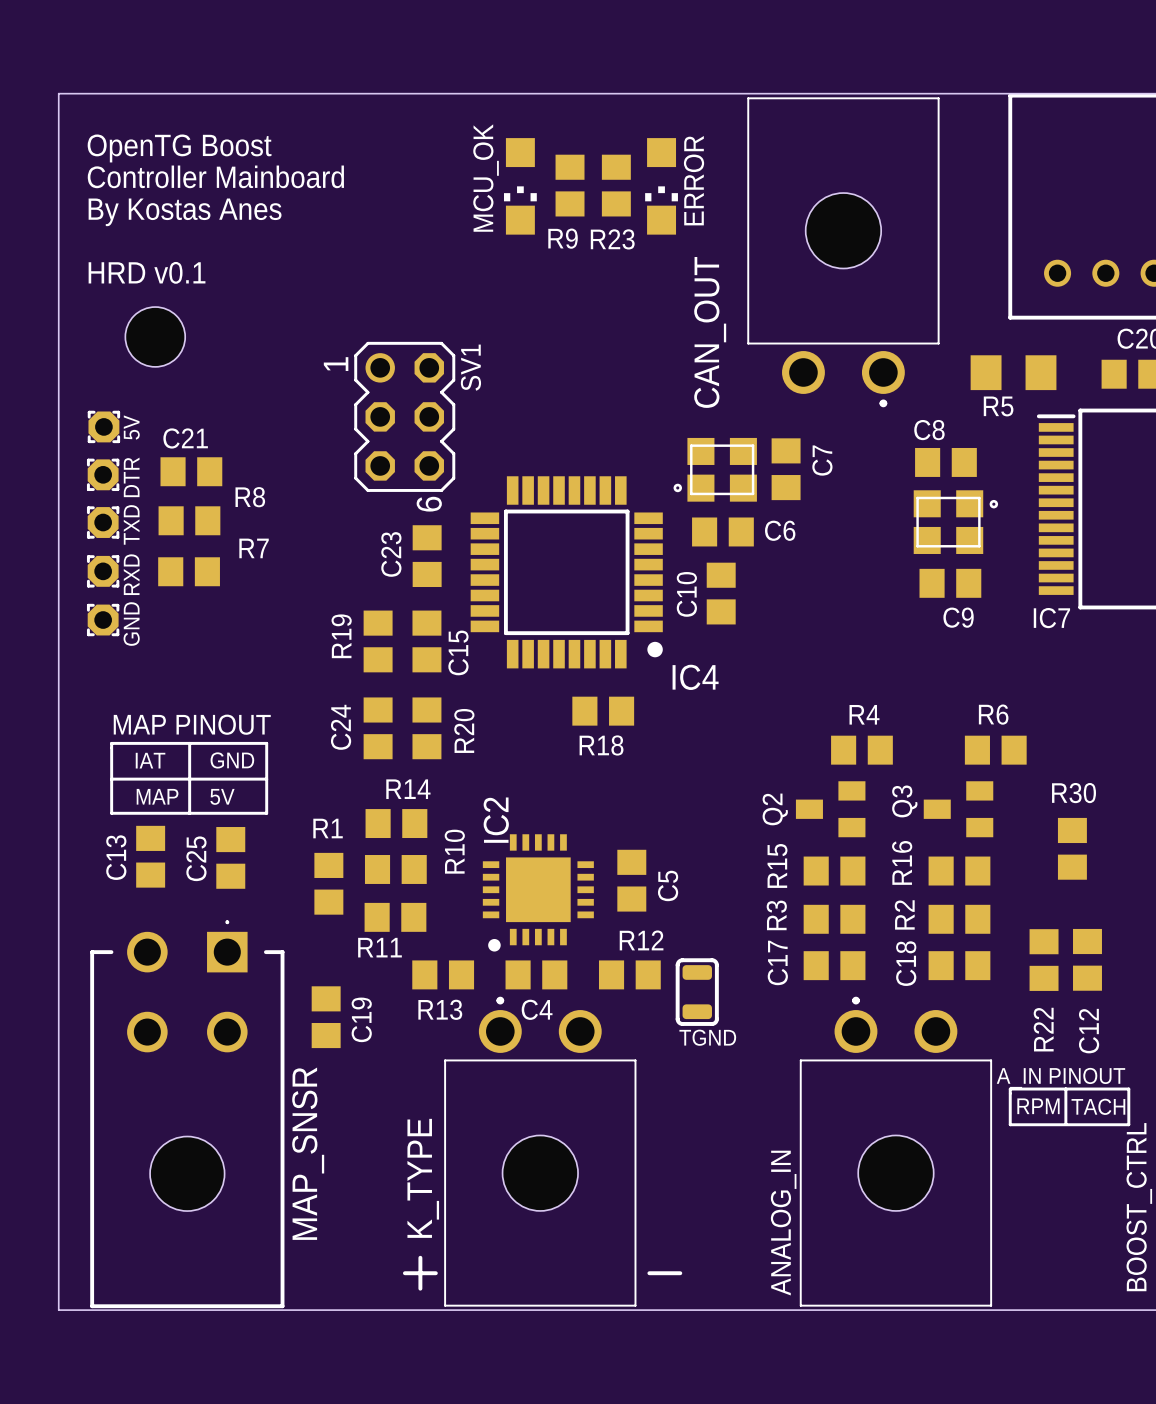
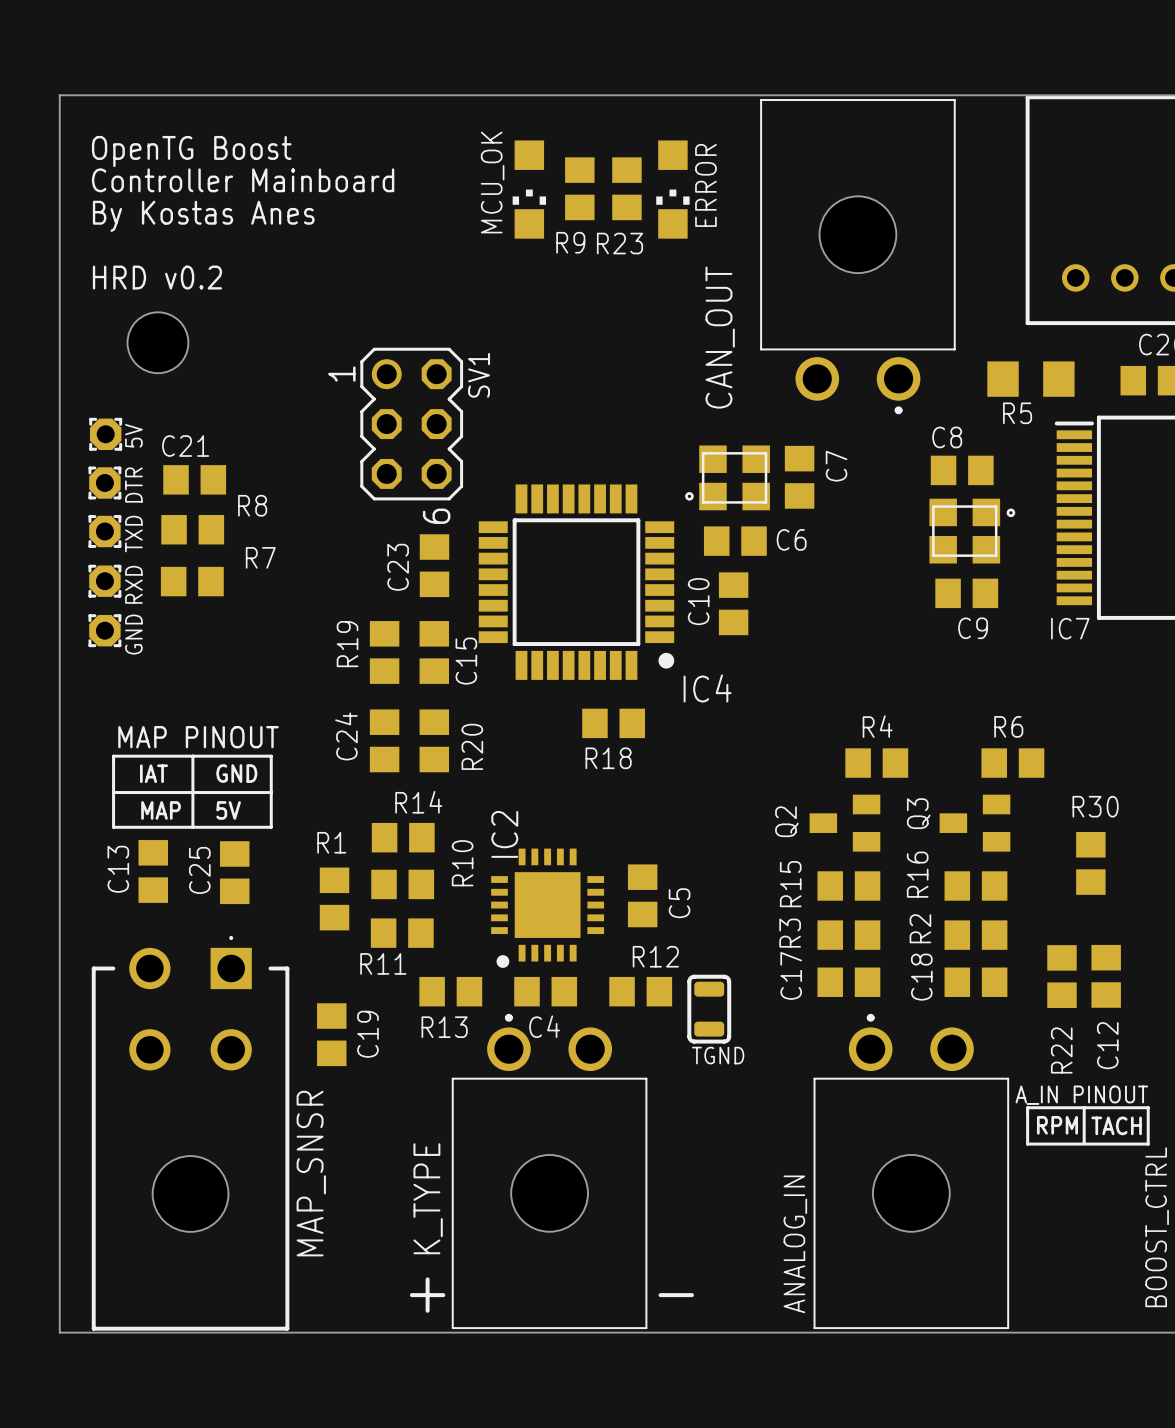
text: HRD v0.1 (147, 272) -> HRD v0.2 (157, 277)

